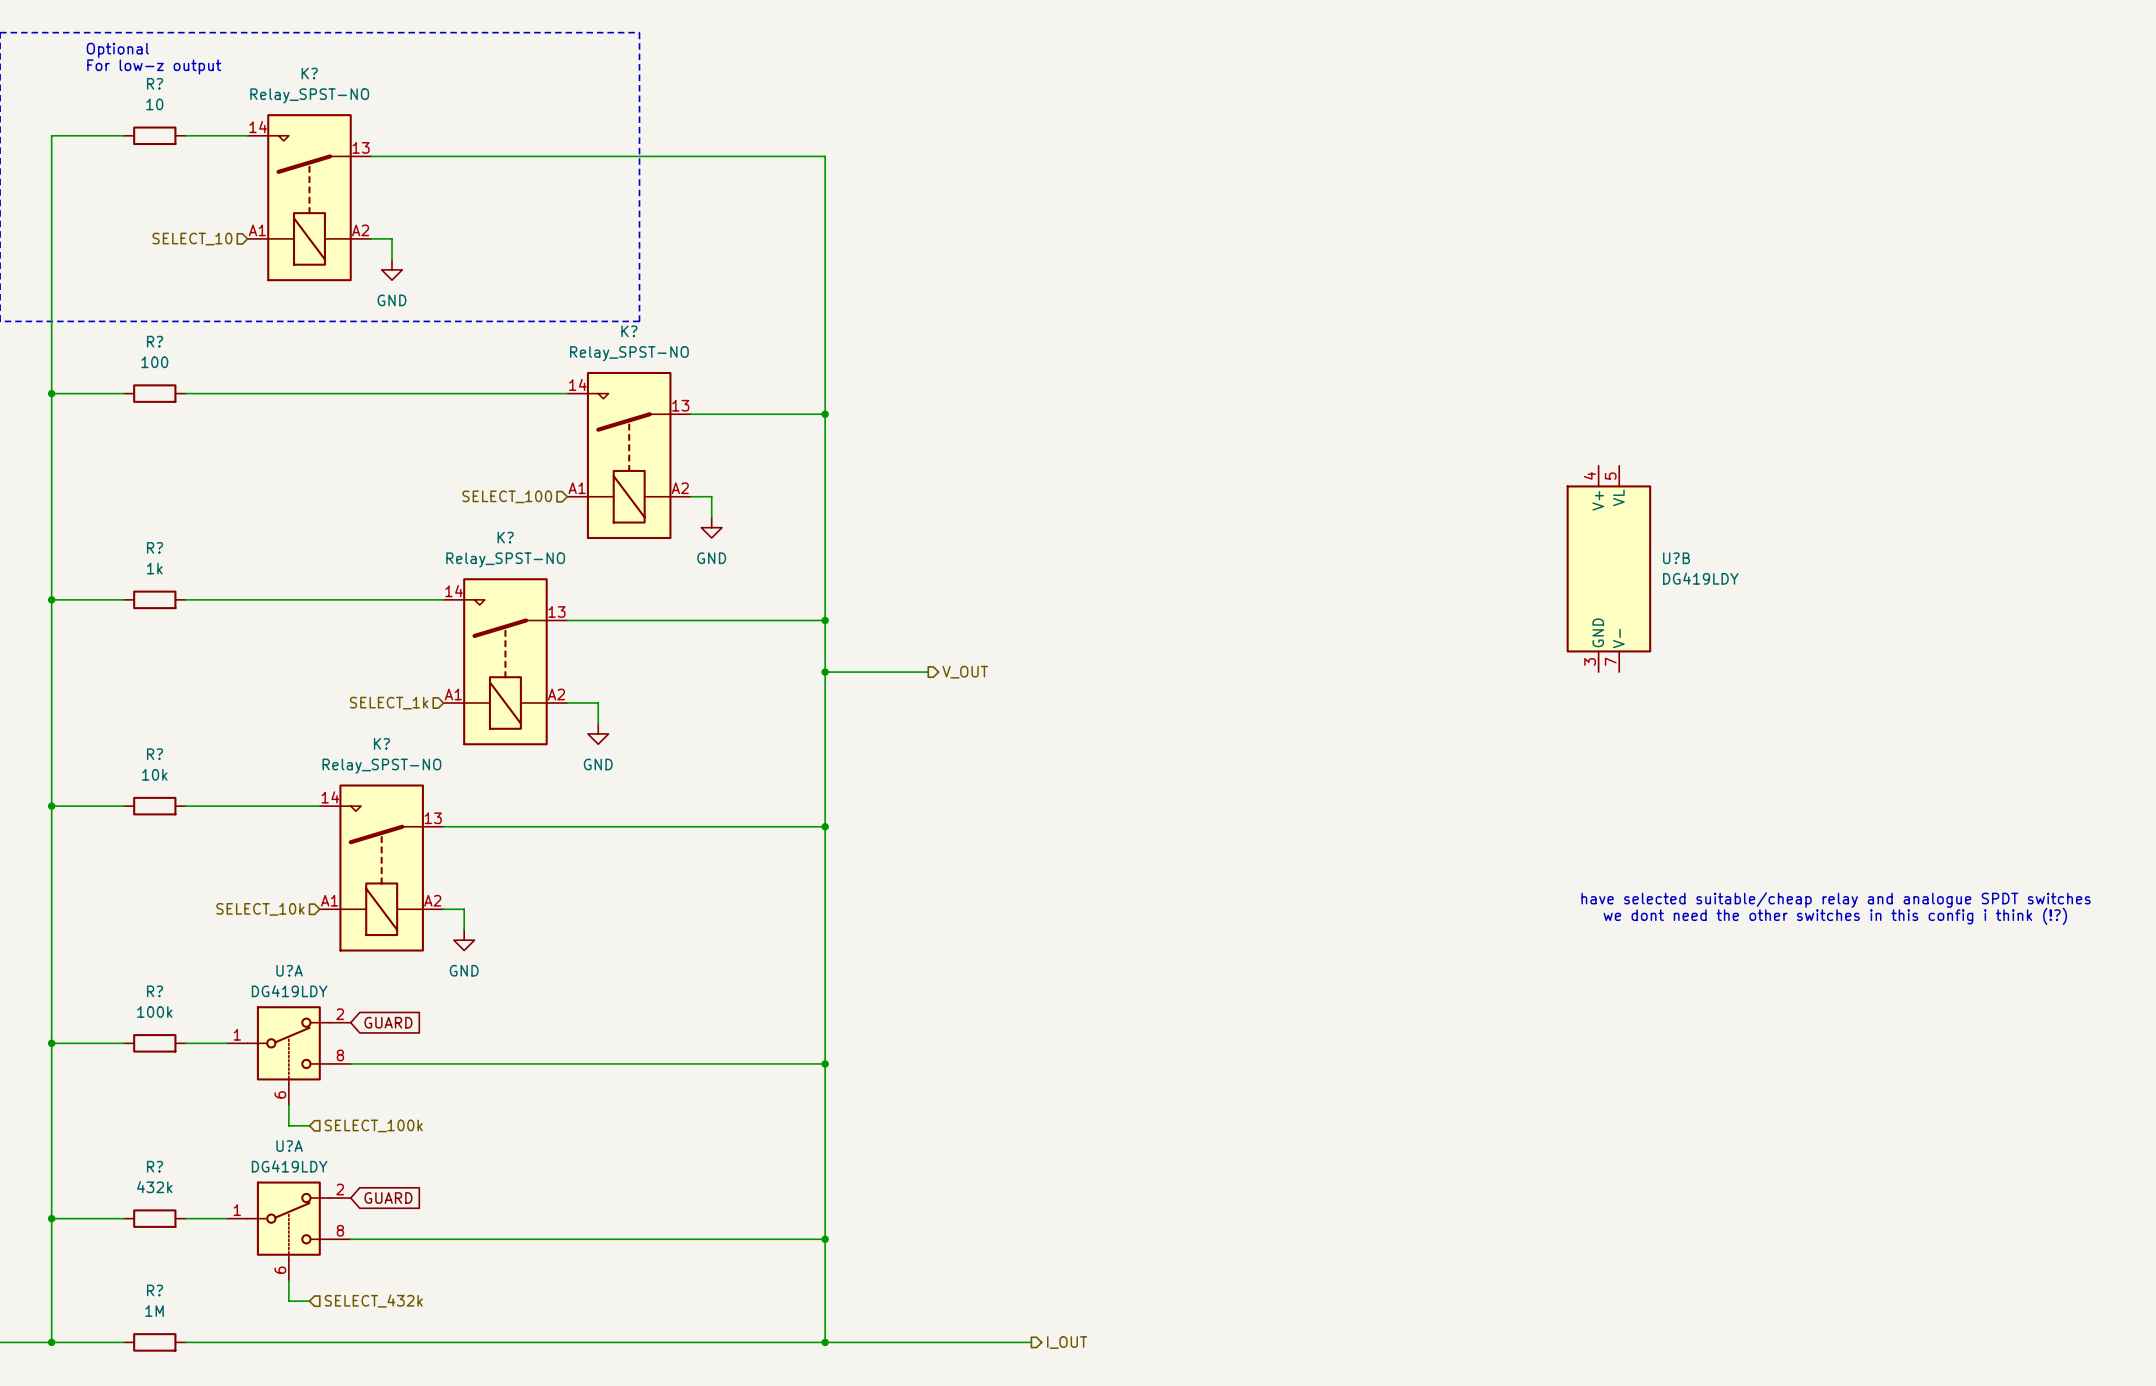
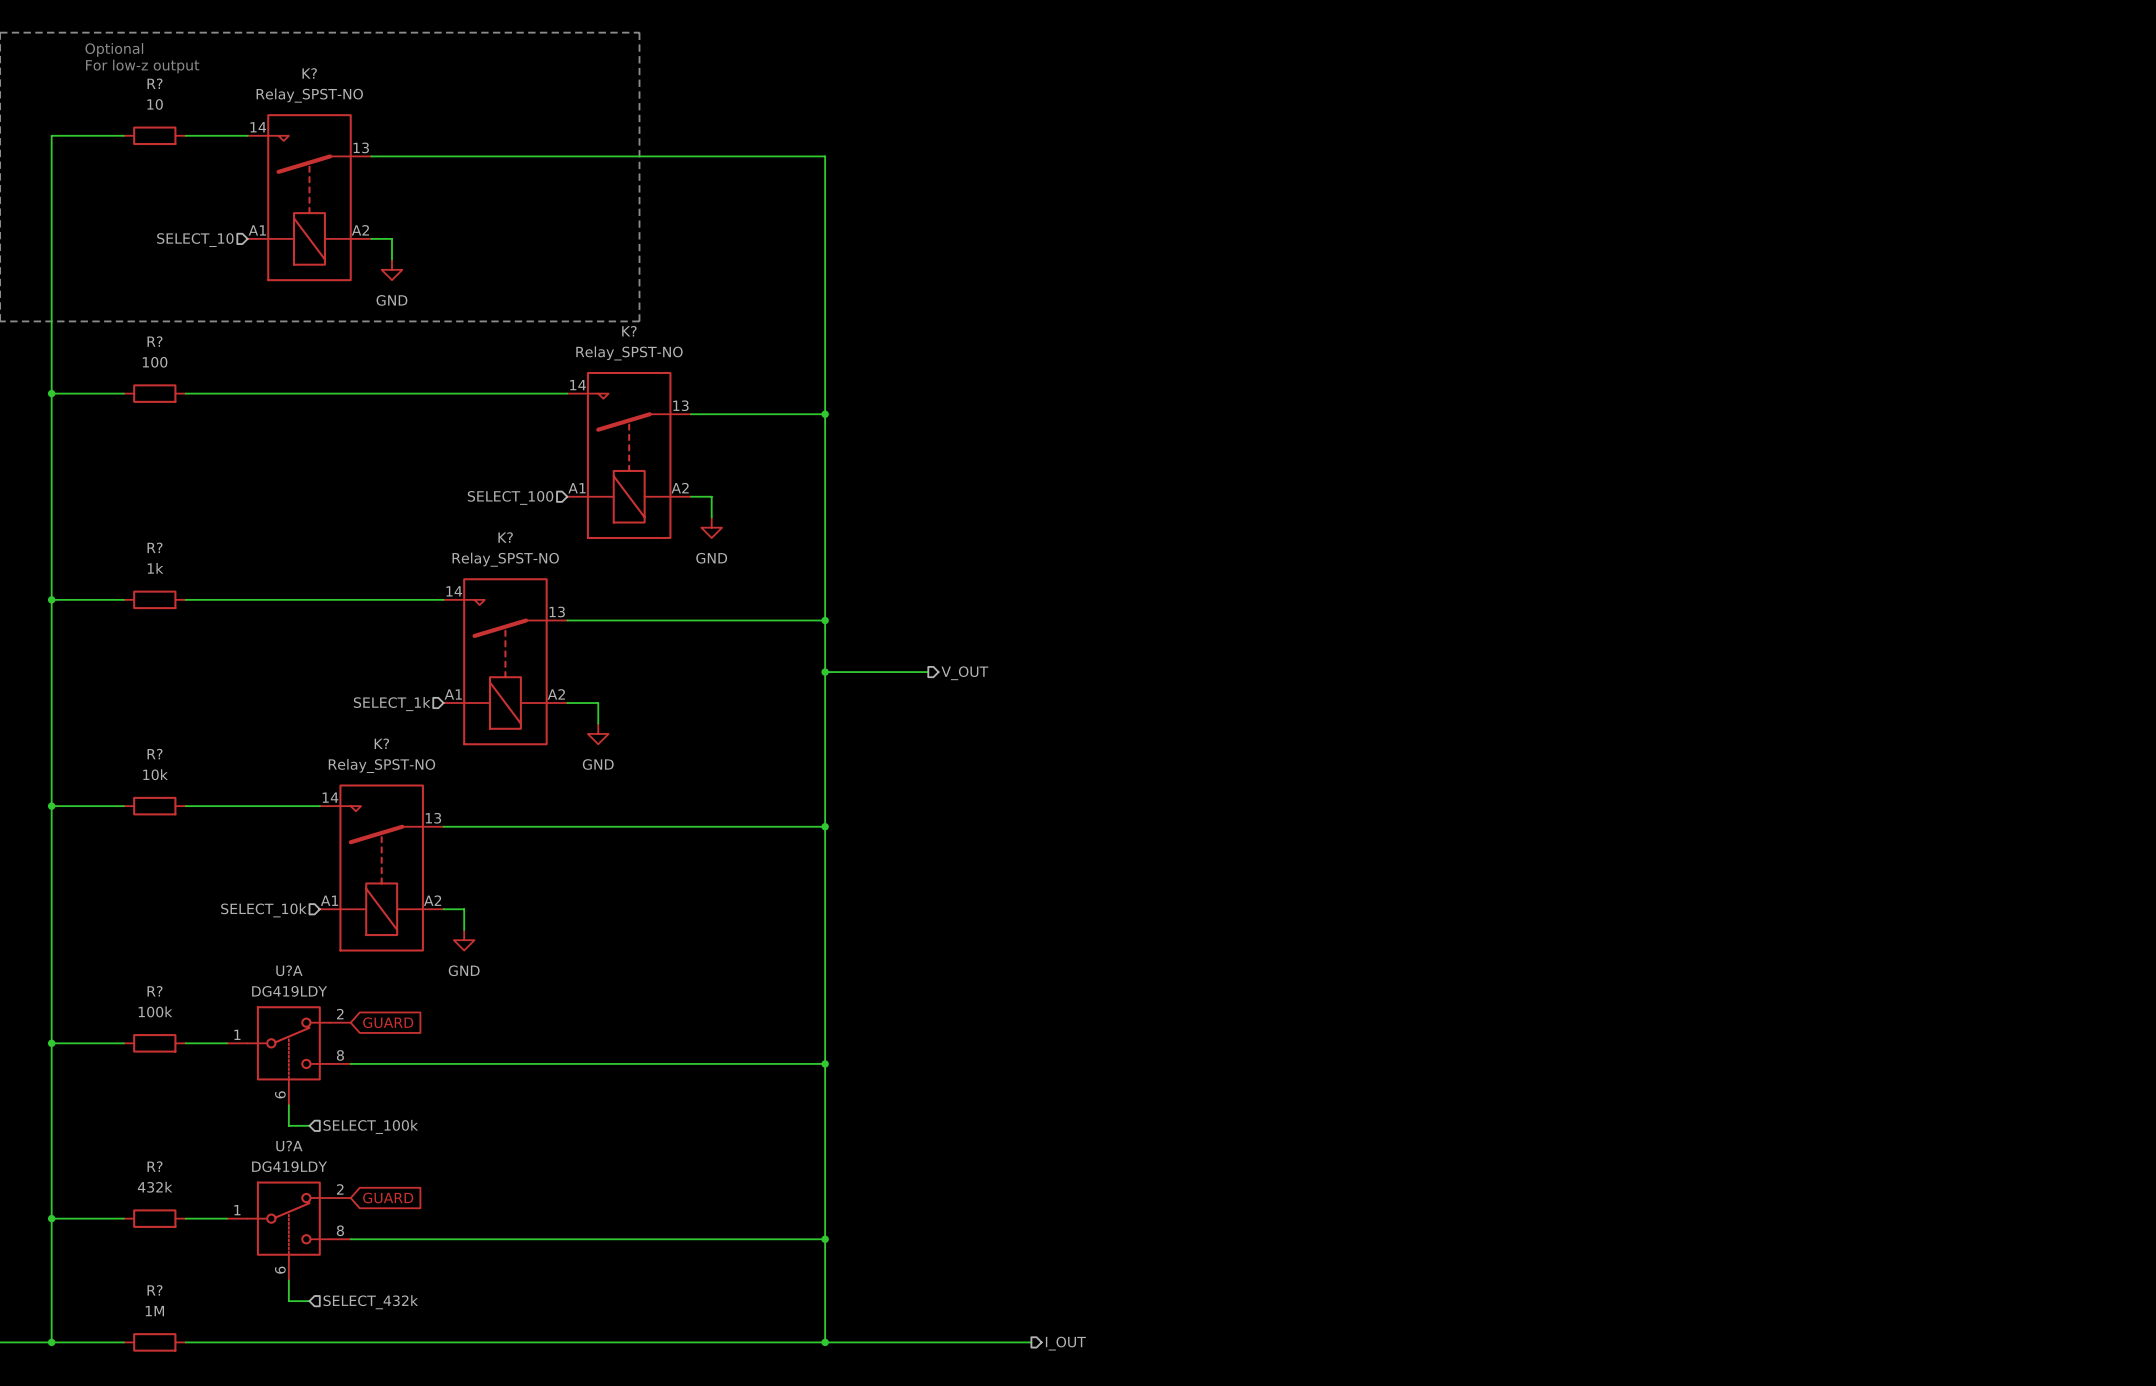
U?B: DG419LDY (1608, 568) -> none
text: have selected suitable/cheap relay and analogue SPDT switches (1836, 900) -> none
text: we dont need the other switches in this config i think (!?) (1835, 916) -> none

